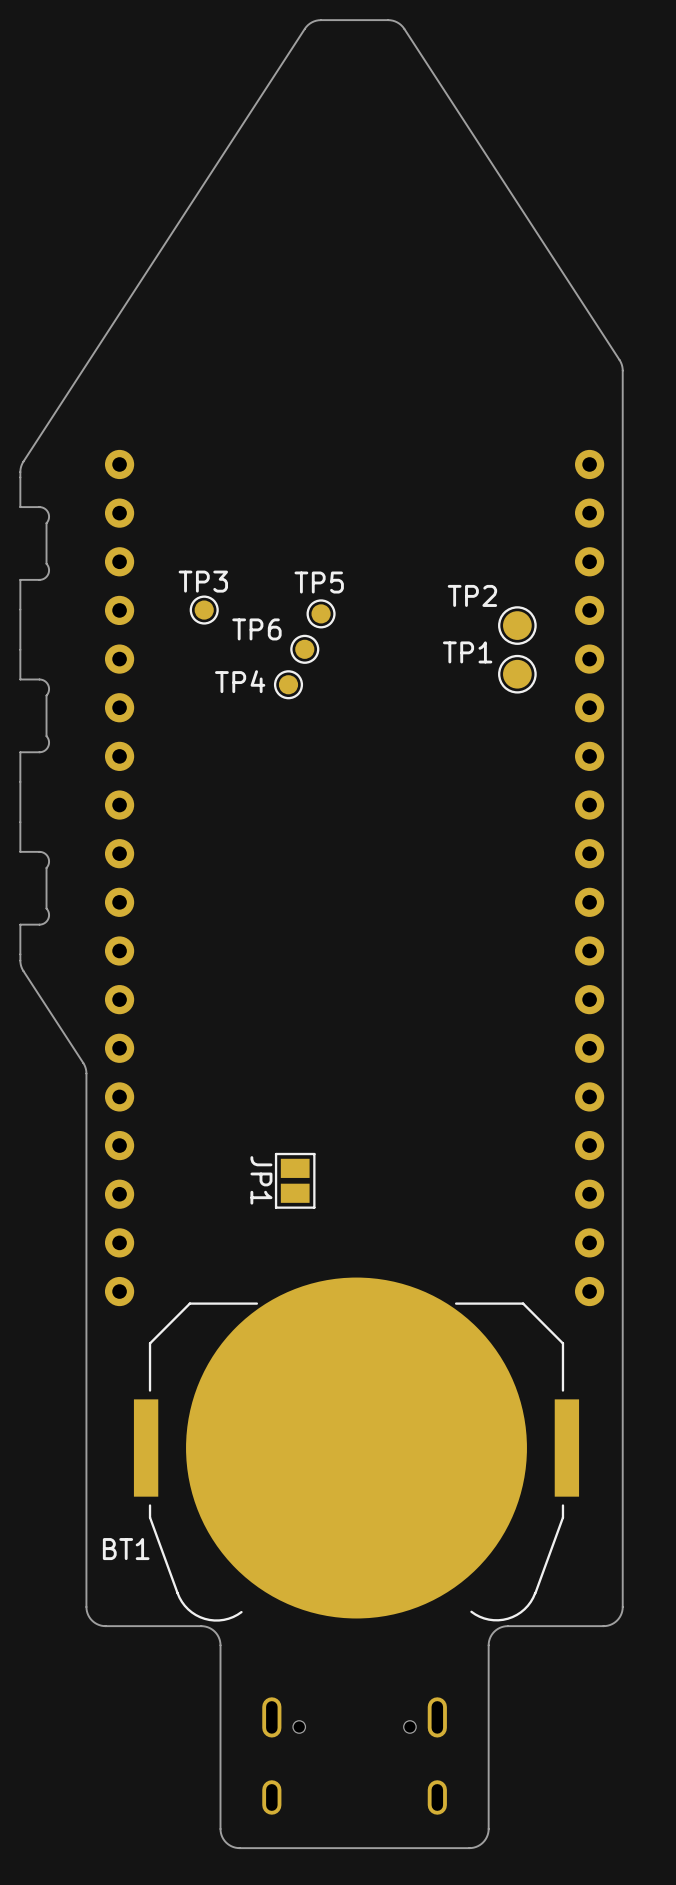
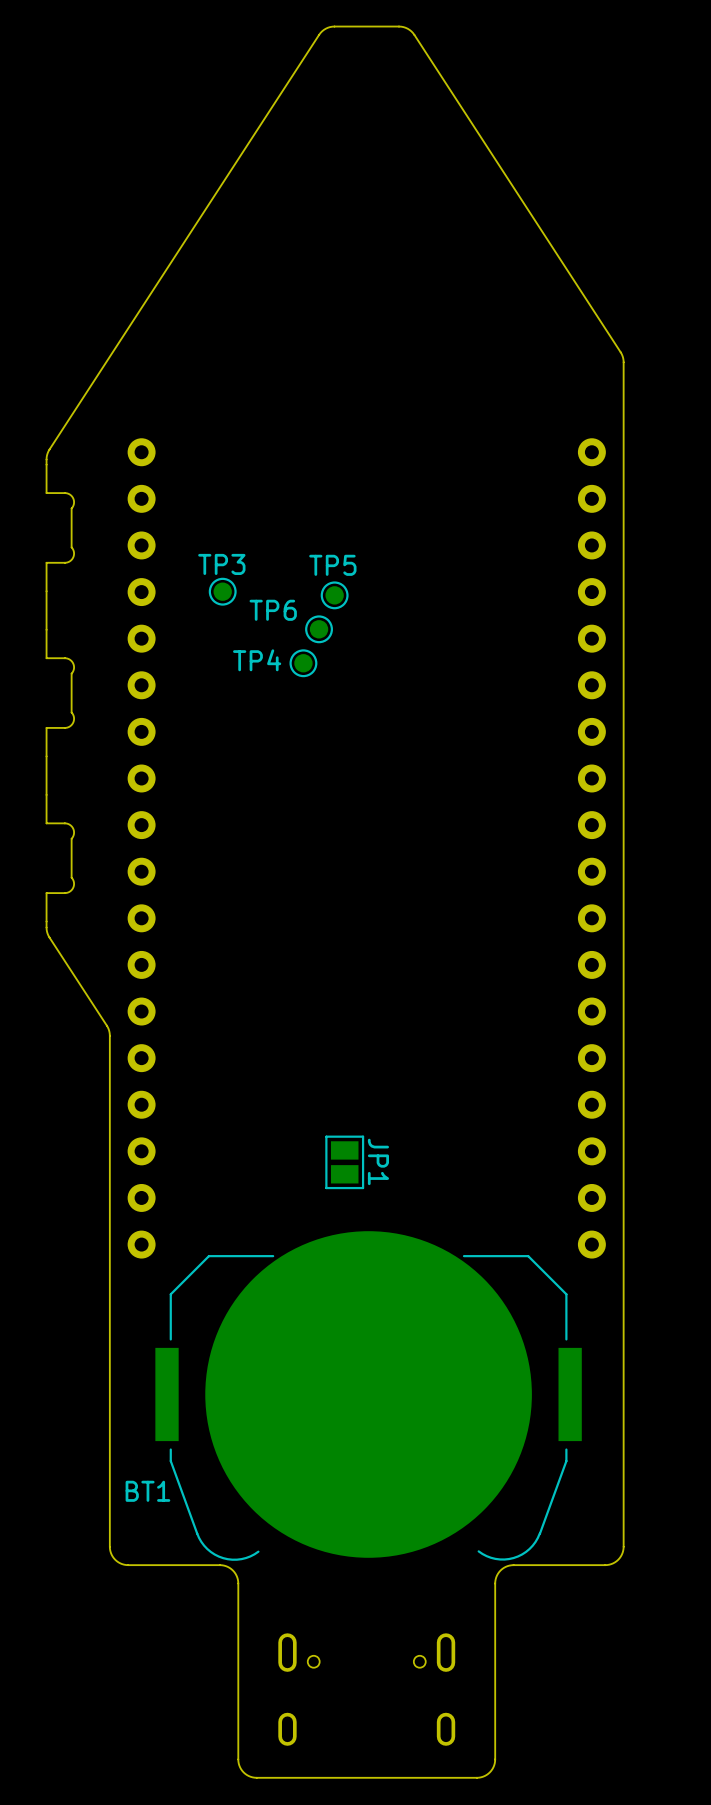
TP2: (517, 625) -> none
TP1: (517, 674) -> none
JP1 name position: JP1 (261, 1180) -> JP1 (378, 1161)
JP1 position: (295, 1180) -> (344, 1162)

